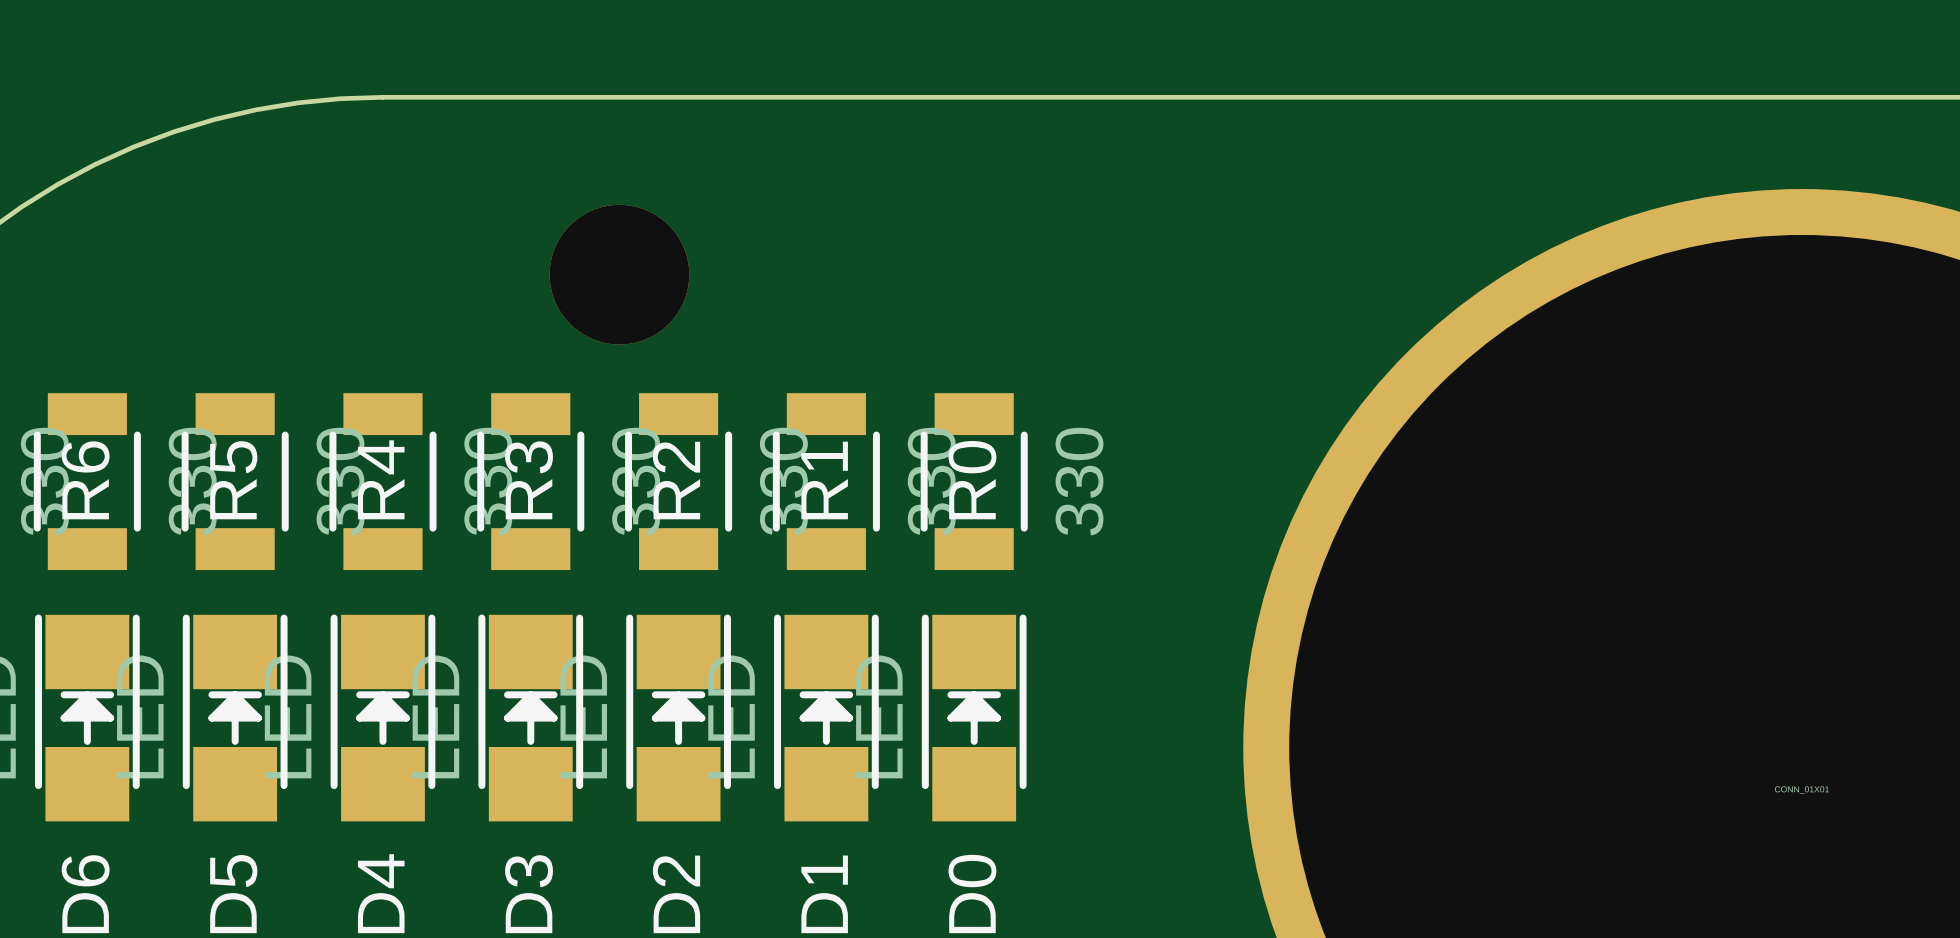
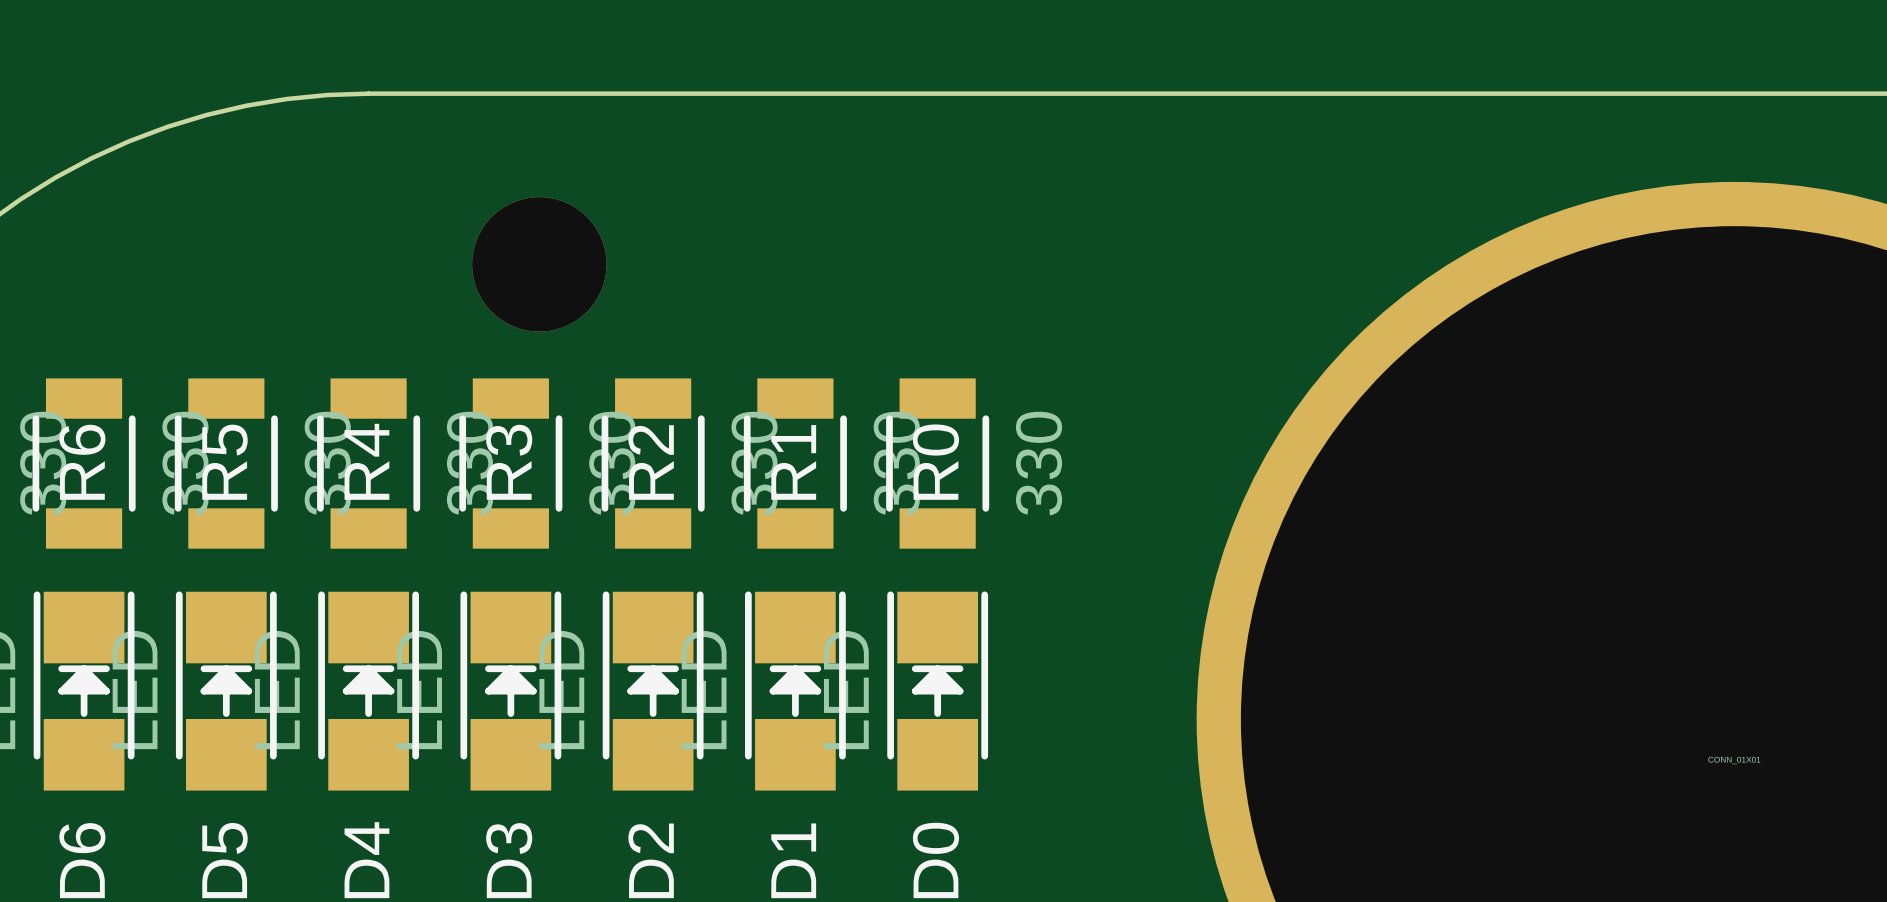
part position: (619, 274) -> (539, 264)

